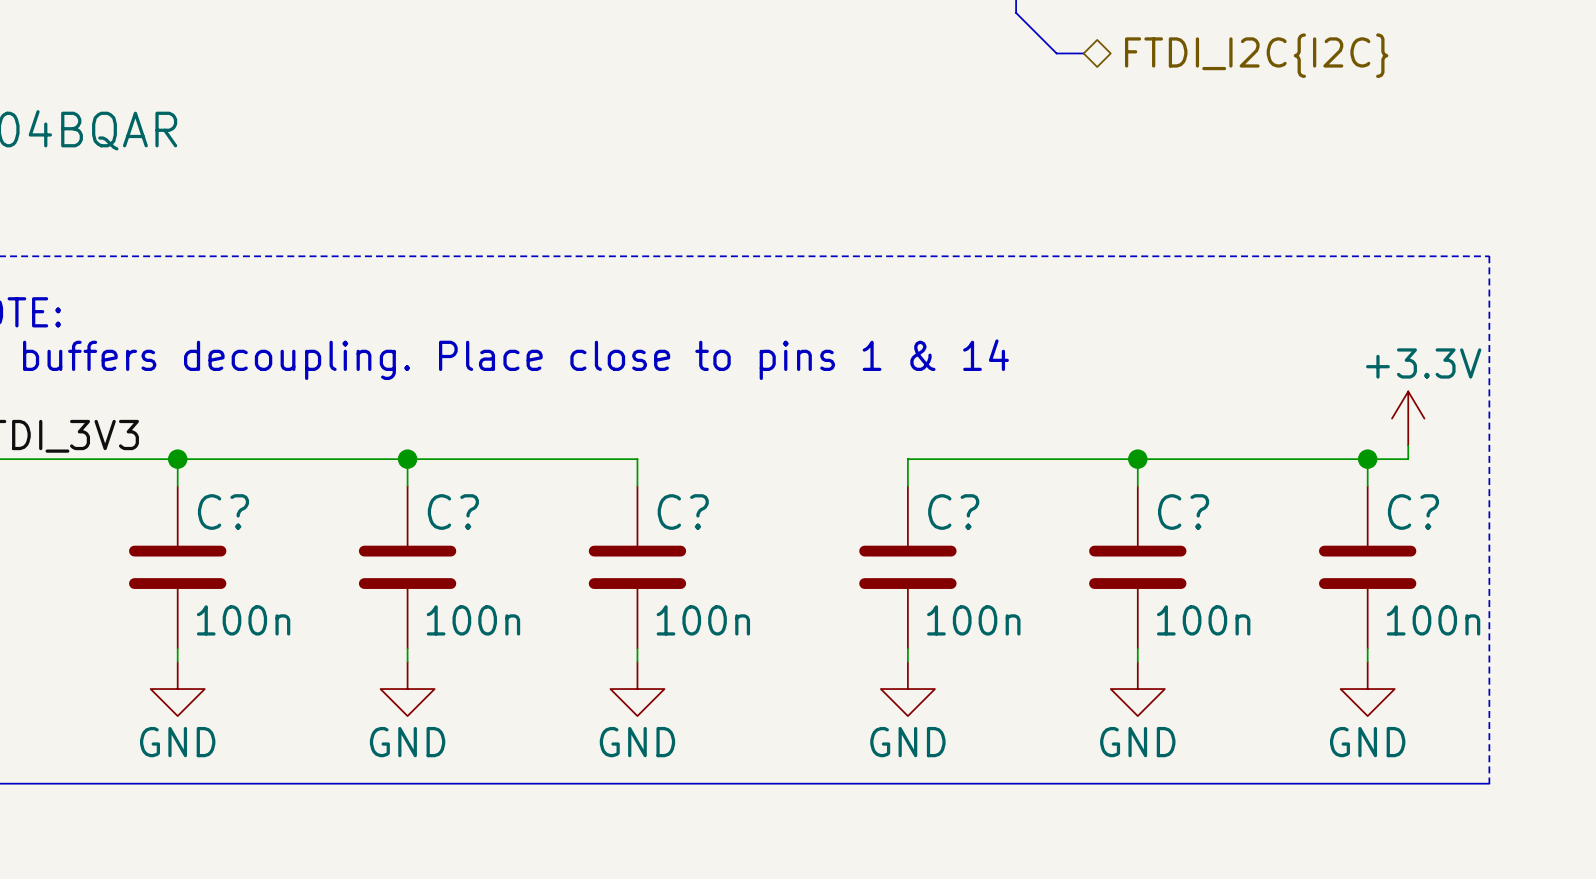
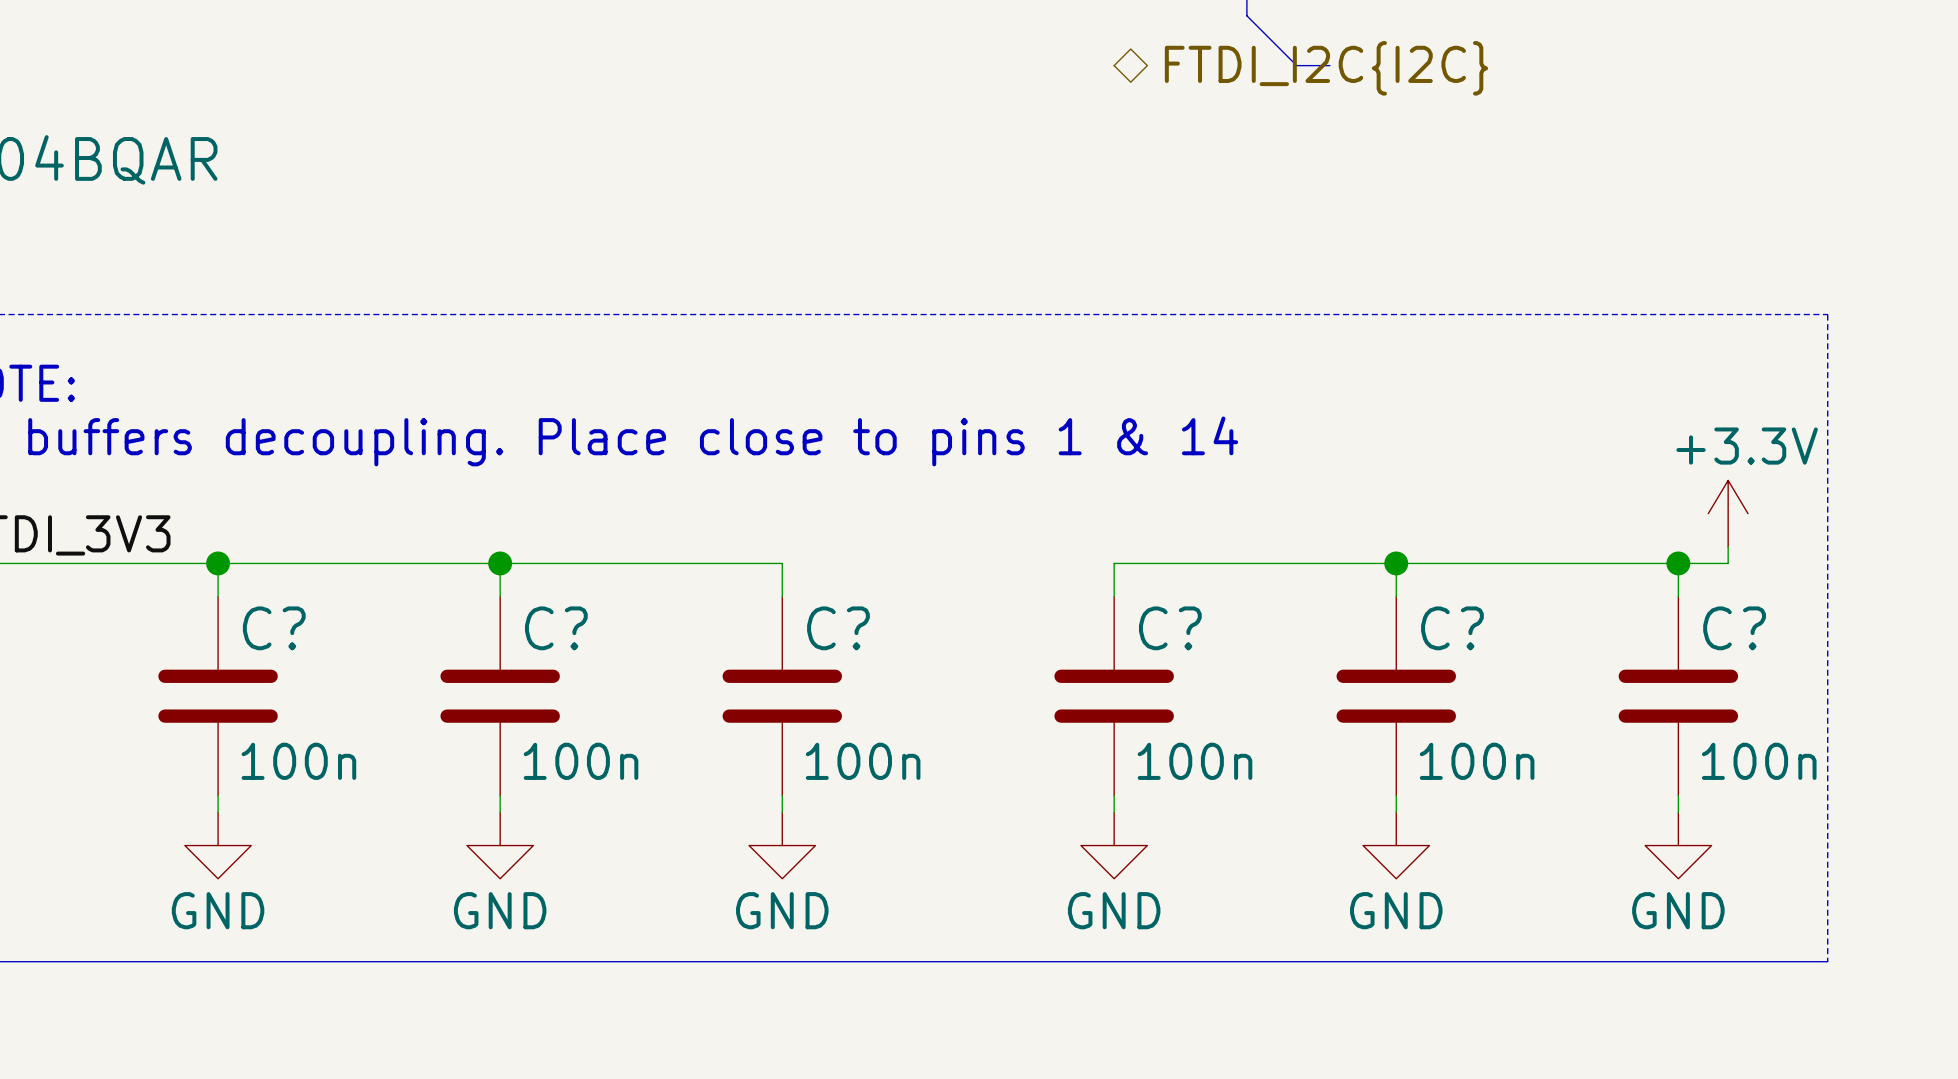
hierarchical label position: FTDI_I2C{I2C} (1256, 55) -> FTDI_I2C{I2C} (1326, 68)

